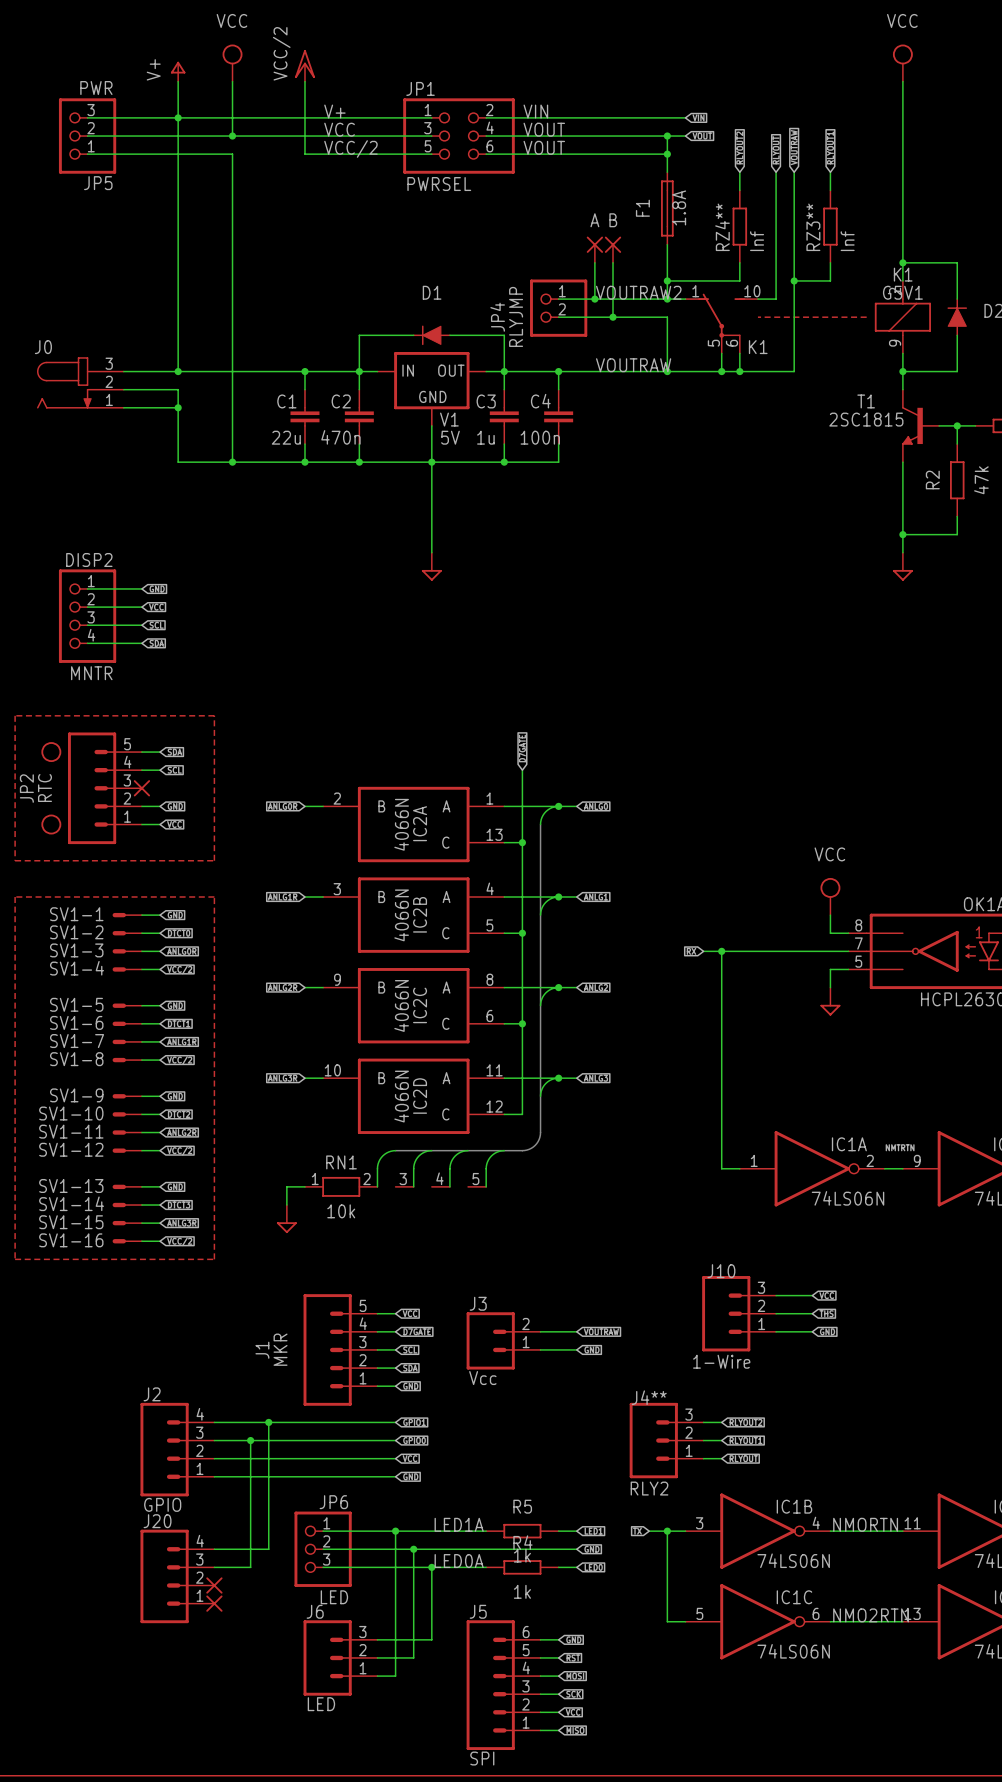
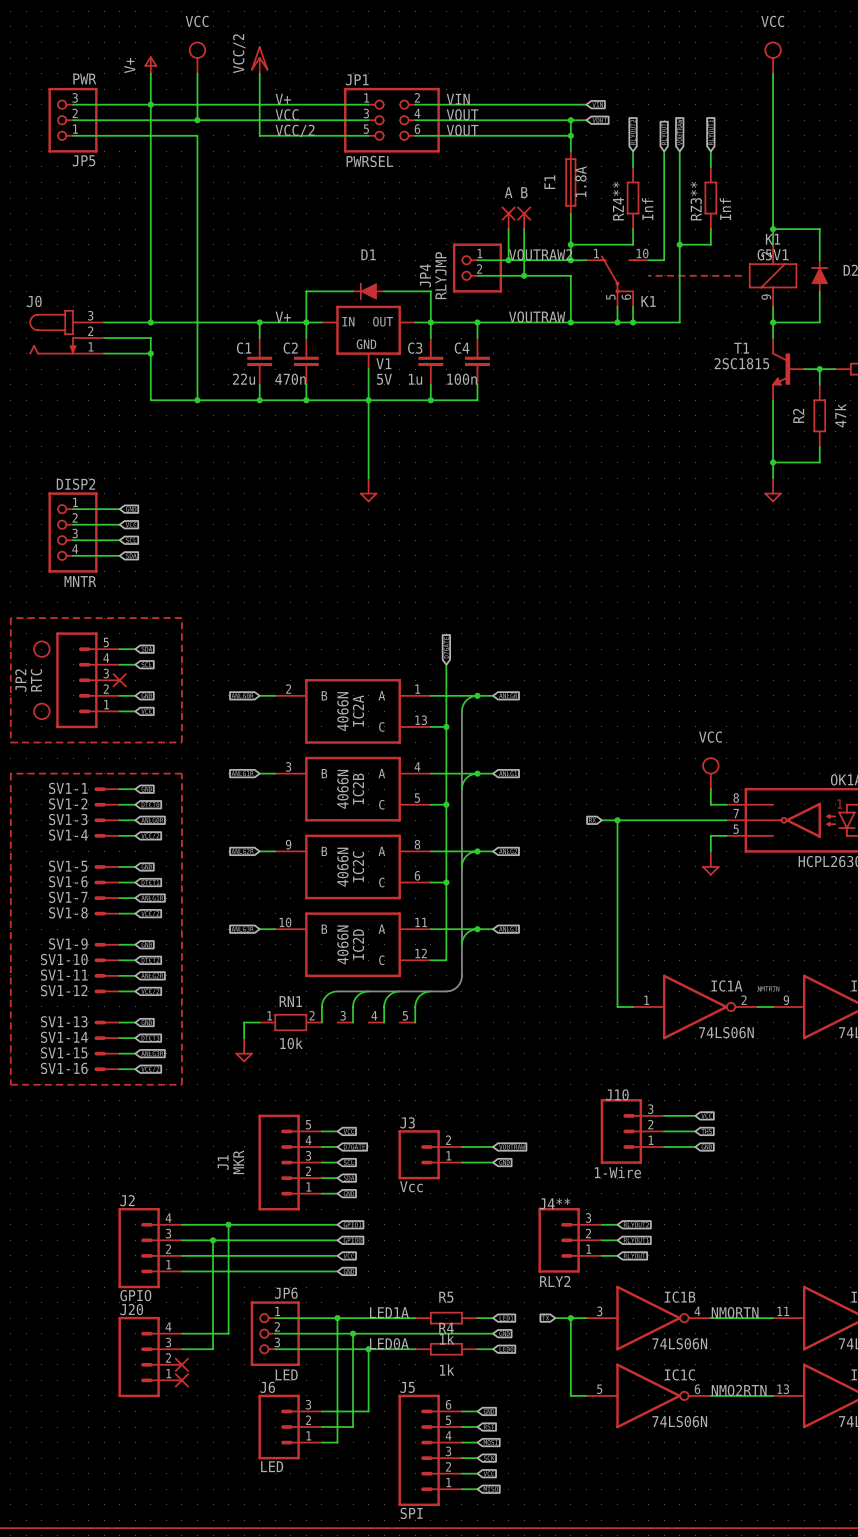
label: none -> V+ (283, 317)

